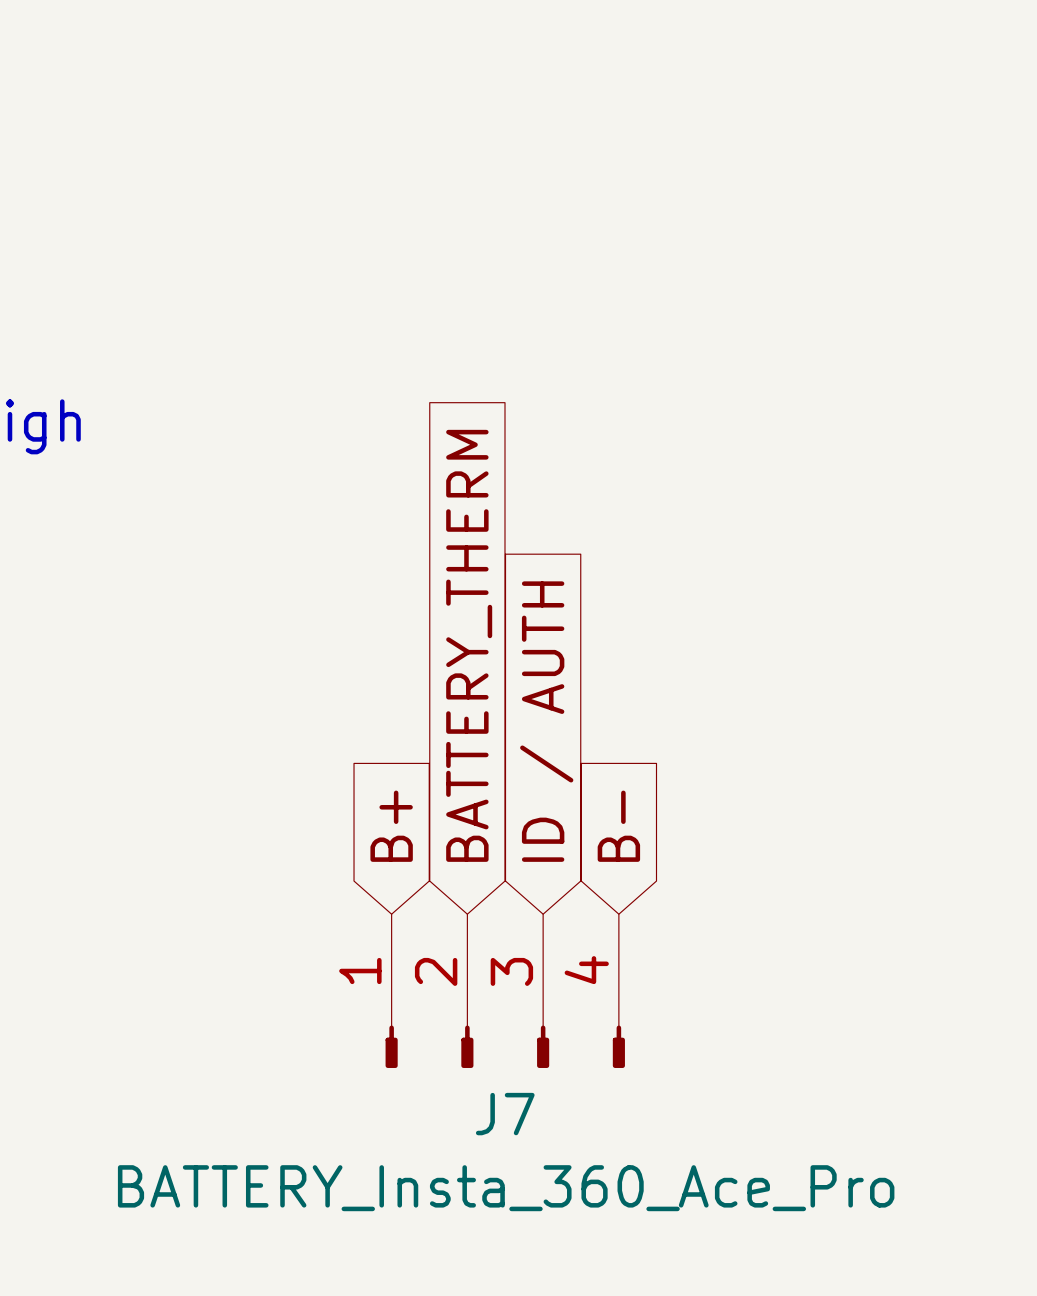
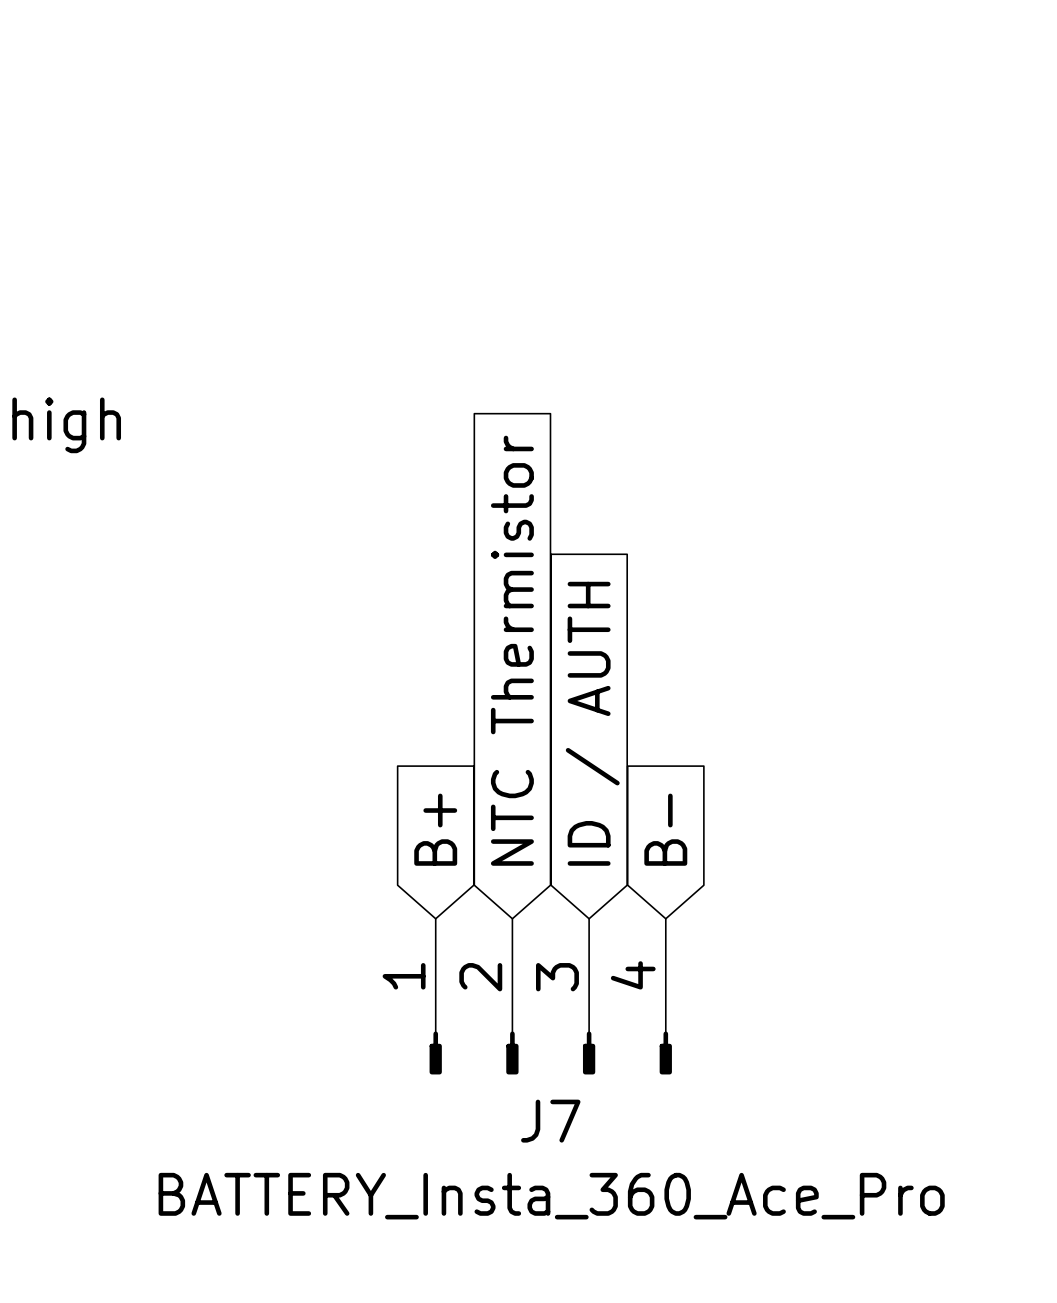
global label: BATTERY_THERM (469, 645) -> NTC Thermistor (512, 650)

